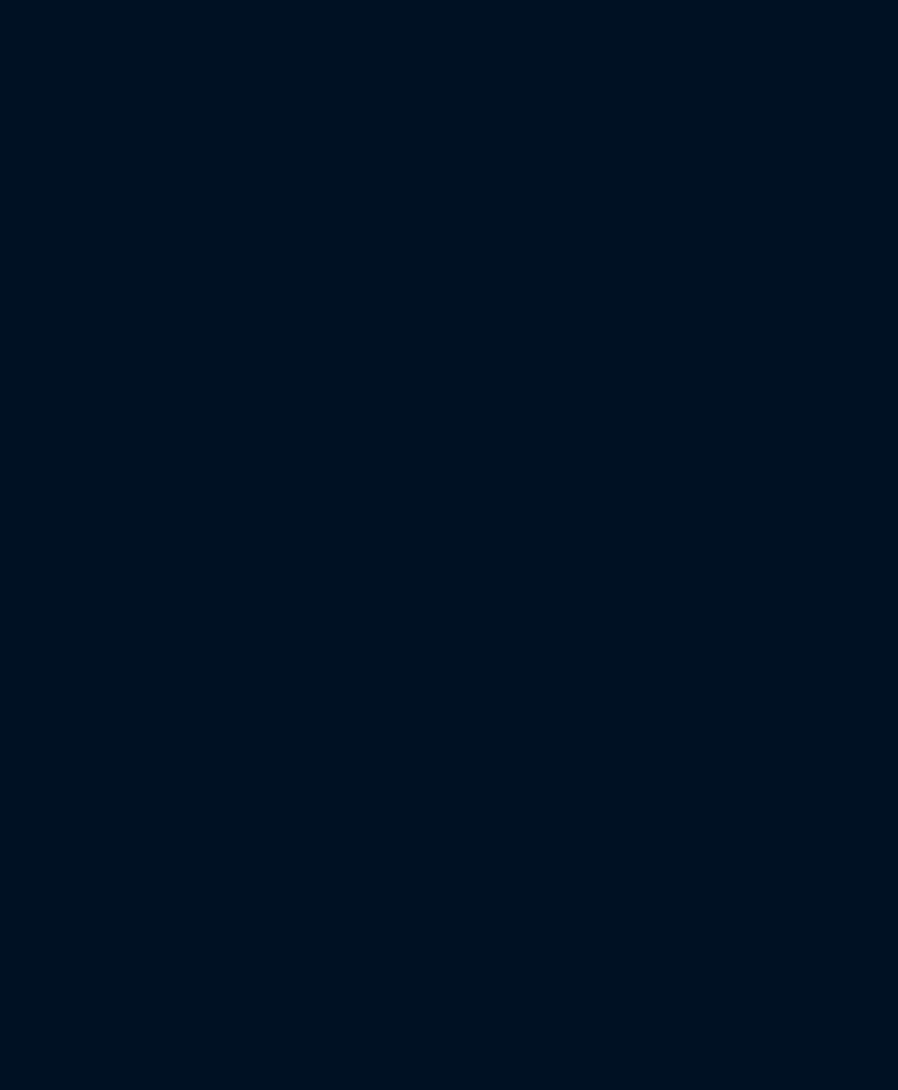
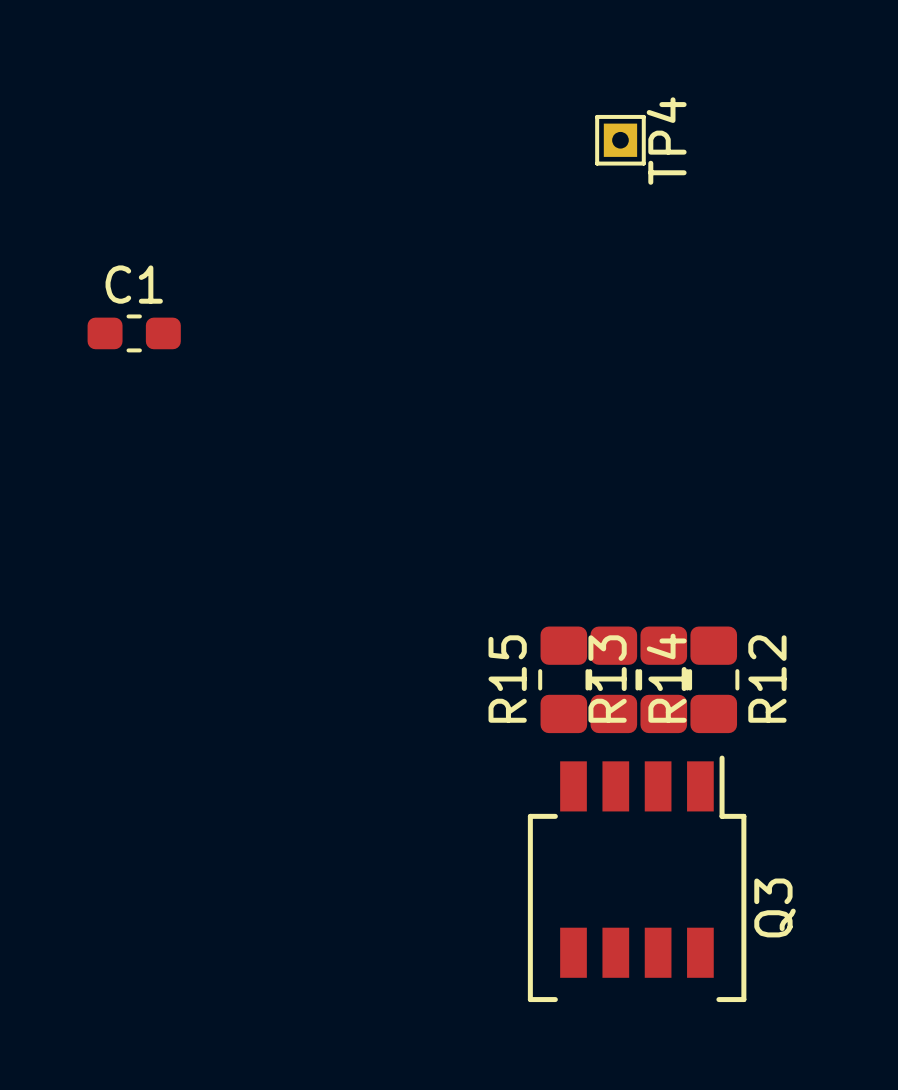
TP4: none -> (620, 140)
C1: none -> (134, 333)
R15: none -> (563, 679)
R14: none -> (613, 679)
R13: none -> (663, 679)
R12: none -> (713, 679)
Q3: none -> (637, 878)

